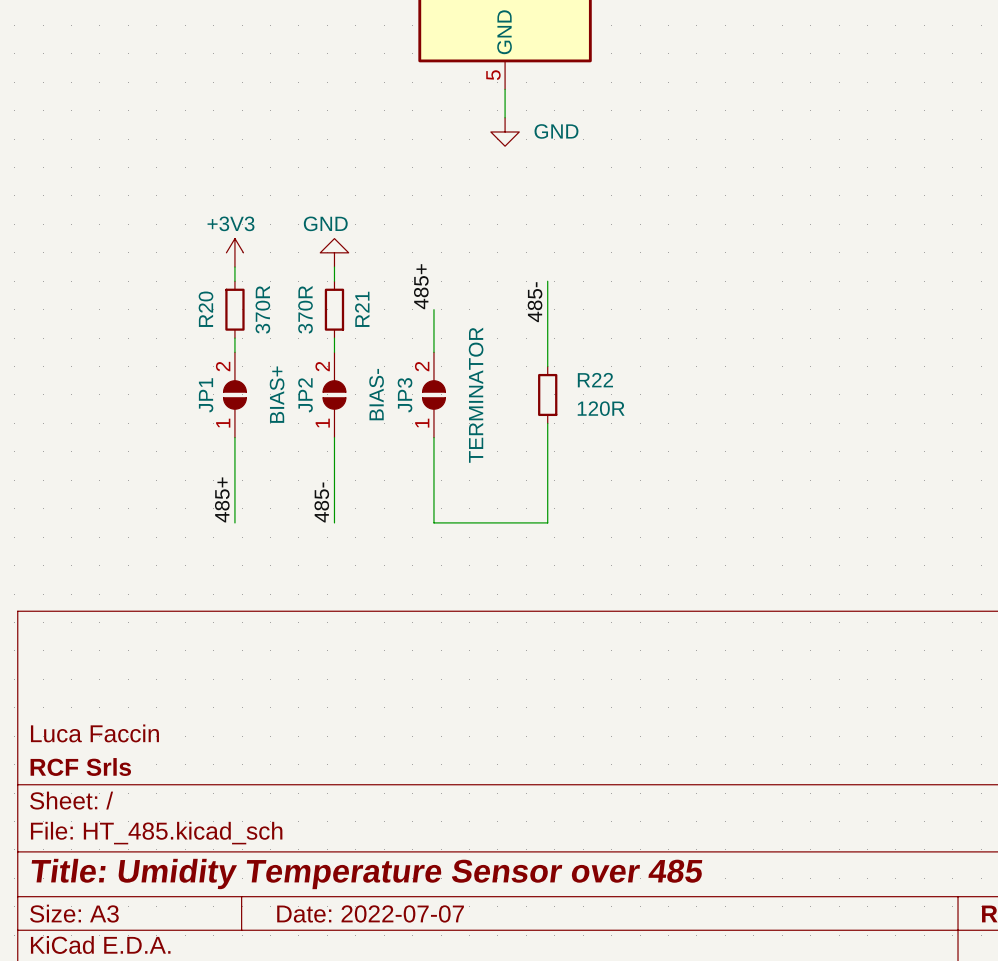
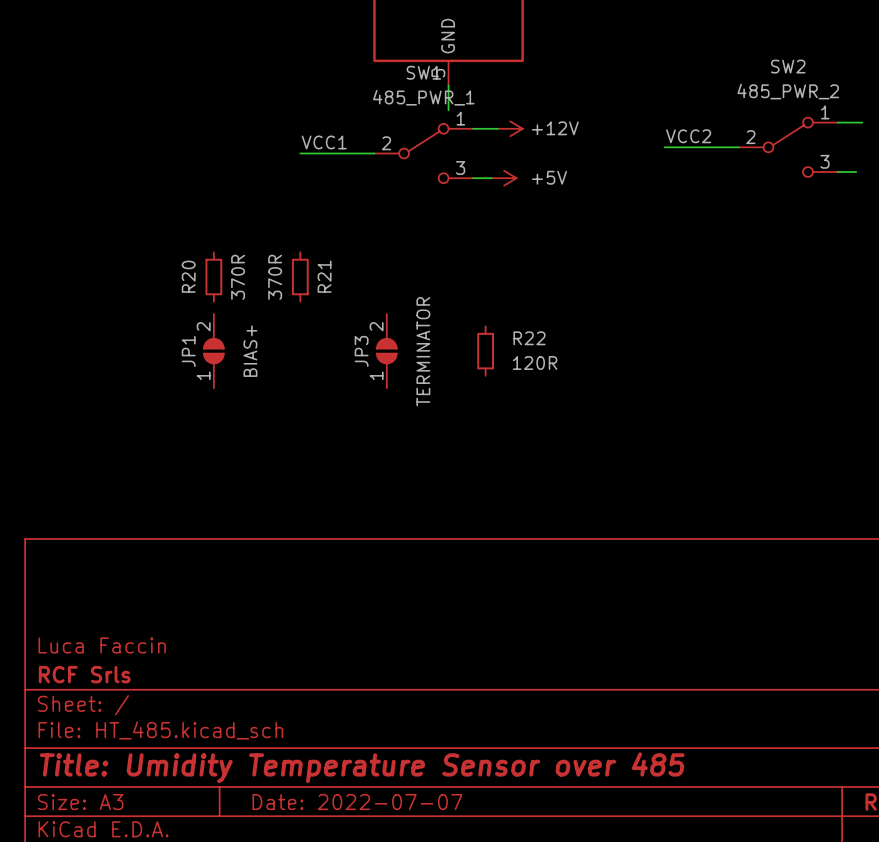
power symbol: GND (505, 131) -> none
wire: none -> (837, 122) (862, 122)
wire: none -> (473, 128) (497, 128)
power symbol: none -> +12V (510, 128)
label: none -> VCC2 (688, 136)
label: none -> VCC1 (324, 142)
wire: none -> (664, 147) (738, 147)
SW2: none -> 485_PWR_2 (788, 147)
wire: none -> (300, 153) (374, 153)
SW1: none -> 485_PWR_1 (423, 153)
wire: none -> (837, 172) (856, 172)
wire: none -> (473, 178) (491, 178)
power symbol: none -> +5V (504, 178)
power symbol: +3V3 (234, 252) -> none
power symbol: GND (334, 252) -> none
wire: (234, 267) (234, 281) -> none
wire: (334, 267) (334, 281) -> none
wire: (547, 281) (547, 366) -> none
label: 485+ (421, 286) -> none
label: 485- (535, 302) -> none
wire: (433, 309) (433, 352) -> none
wire: (234, 338) (234, 352) -> none
wire: (334, 338) (334, 352) -> none
JP2: BIAS- (334, 394) -> none
wire: (547, 423) (547, 522) (433, 522) (433, 437) -> none
wire: (234, 437) (234, 522) -> none
wire: (334, 437) (334, 522) -> none
label: 485+ (222, 499) -> none
label: 485- (321, 502) -> none

